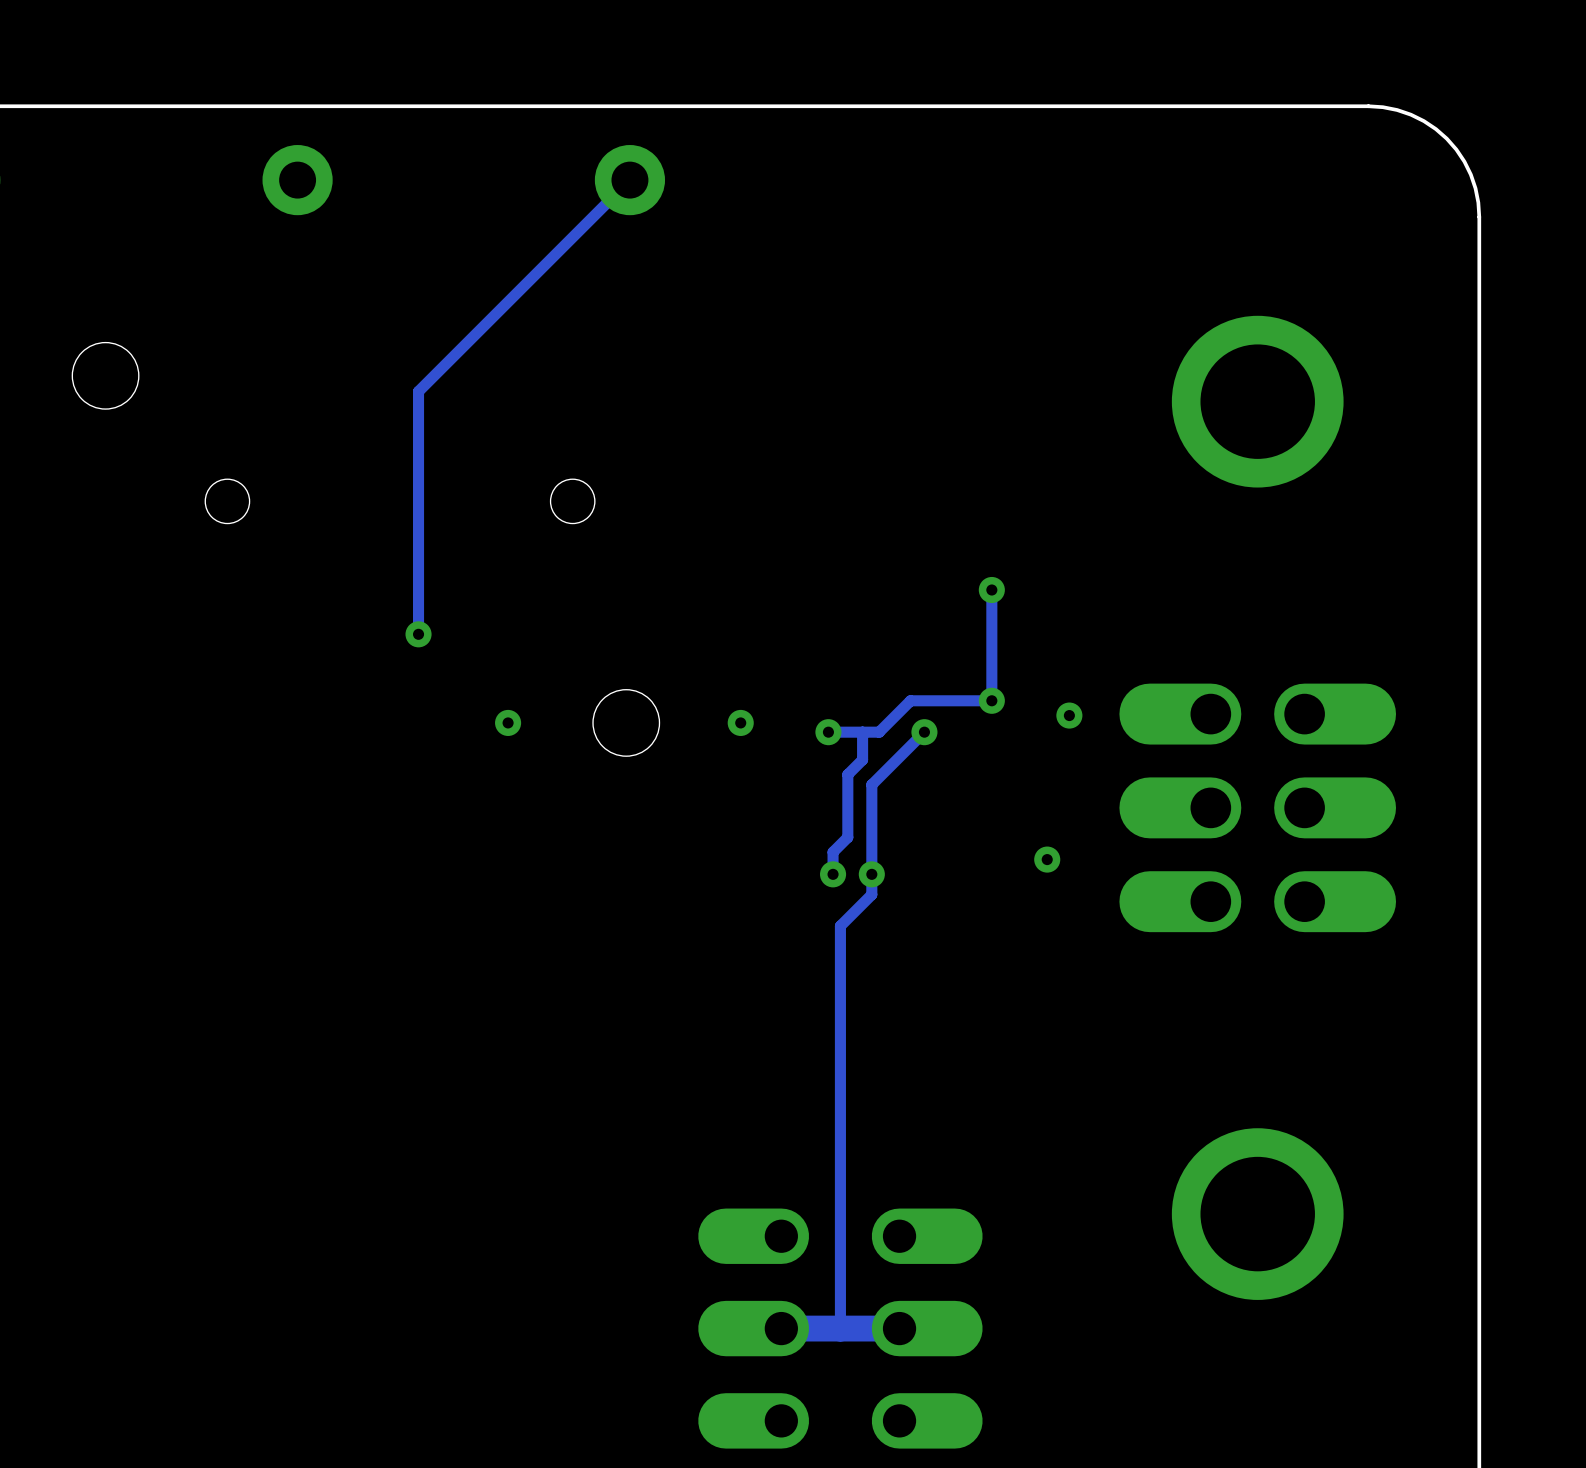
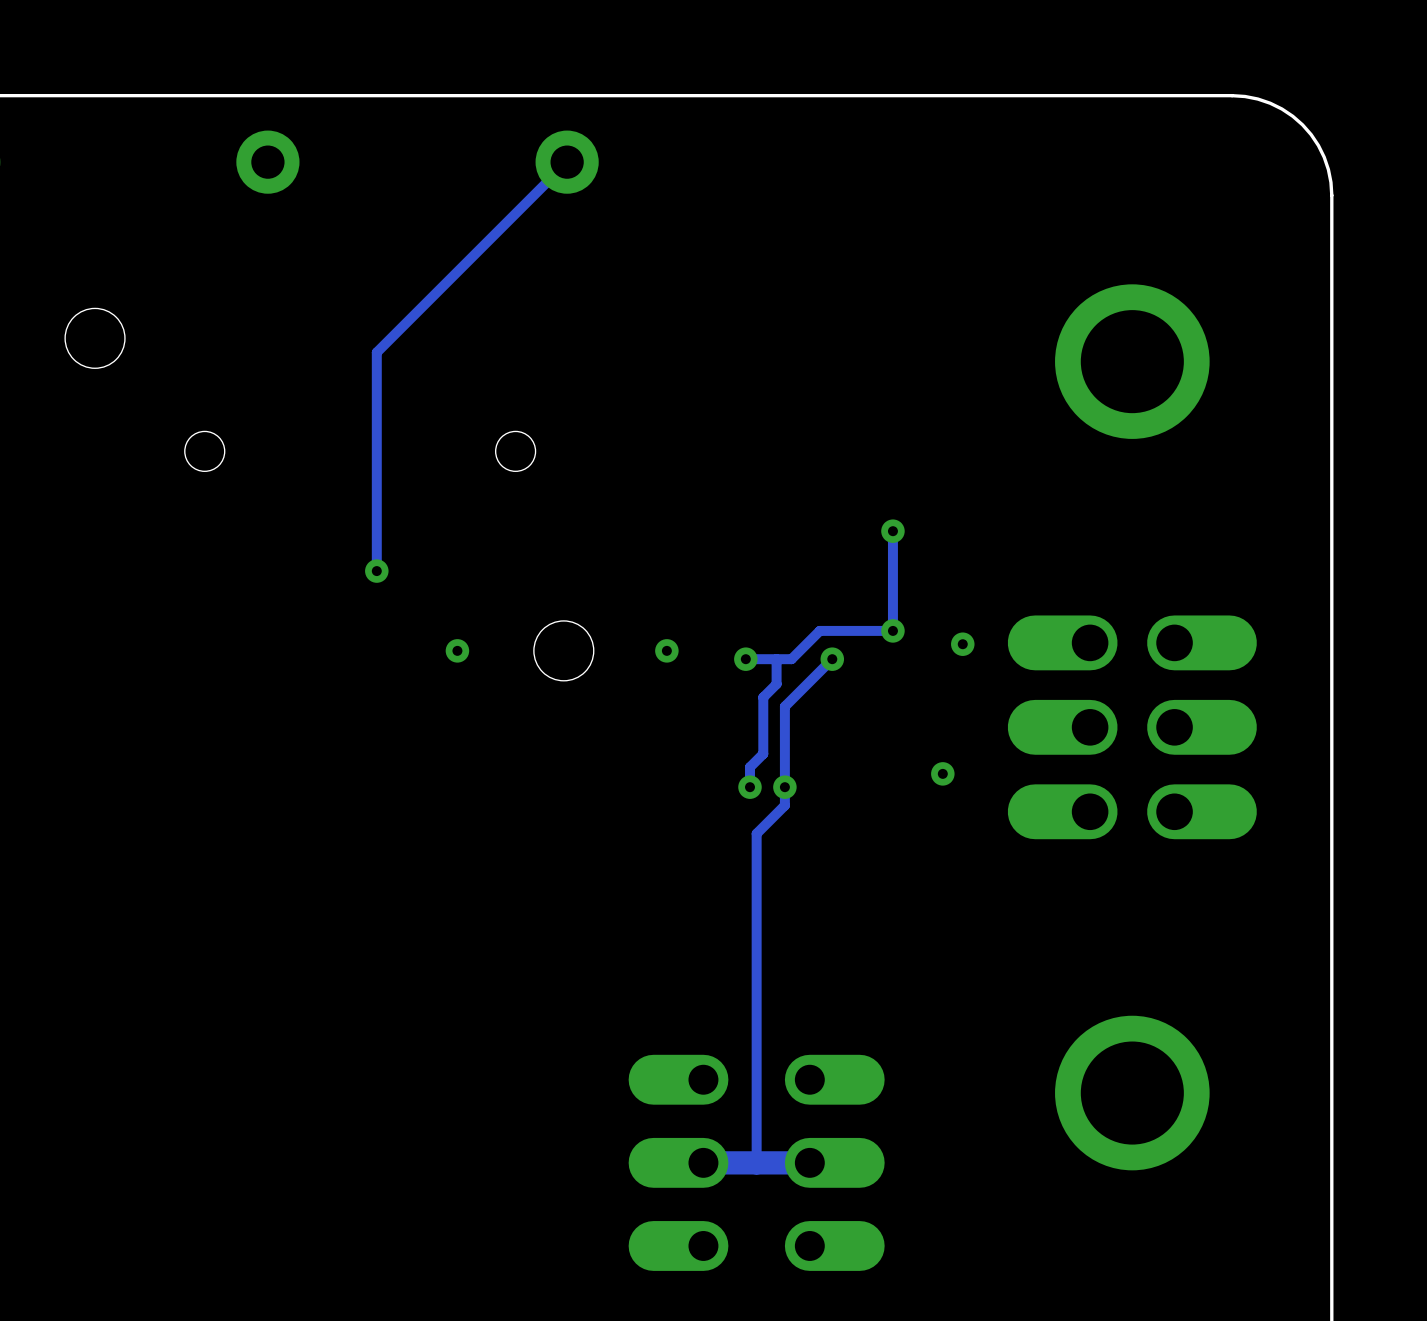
track: (840, 1291) (840, 1328) -> none
part position: (840, 1328) -> (756, 1162)
track: (899, 1328) (781, 1328) -> (809, 1162) (703, 1162)

